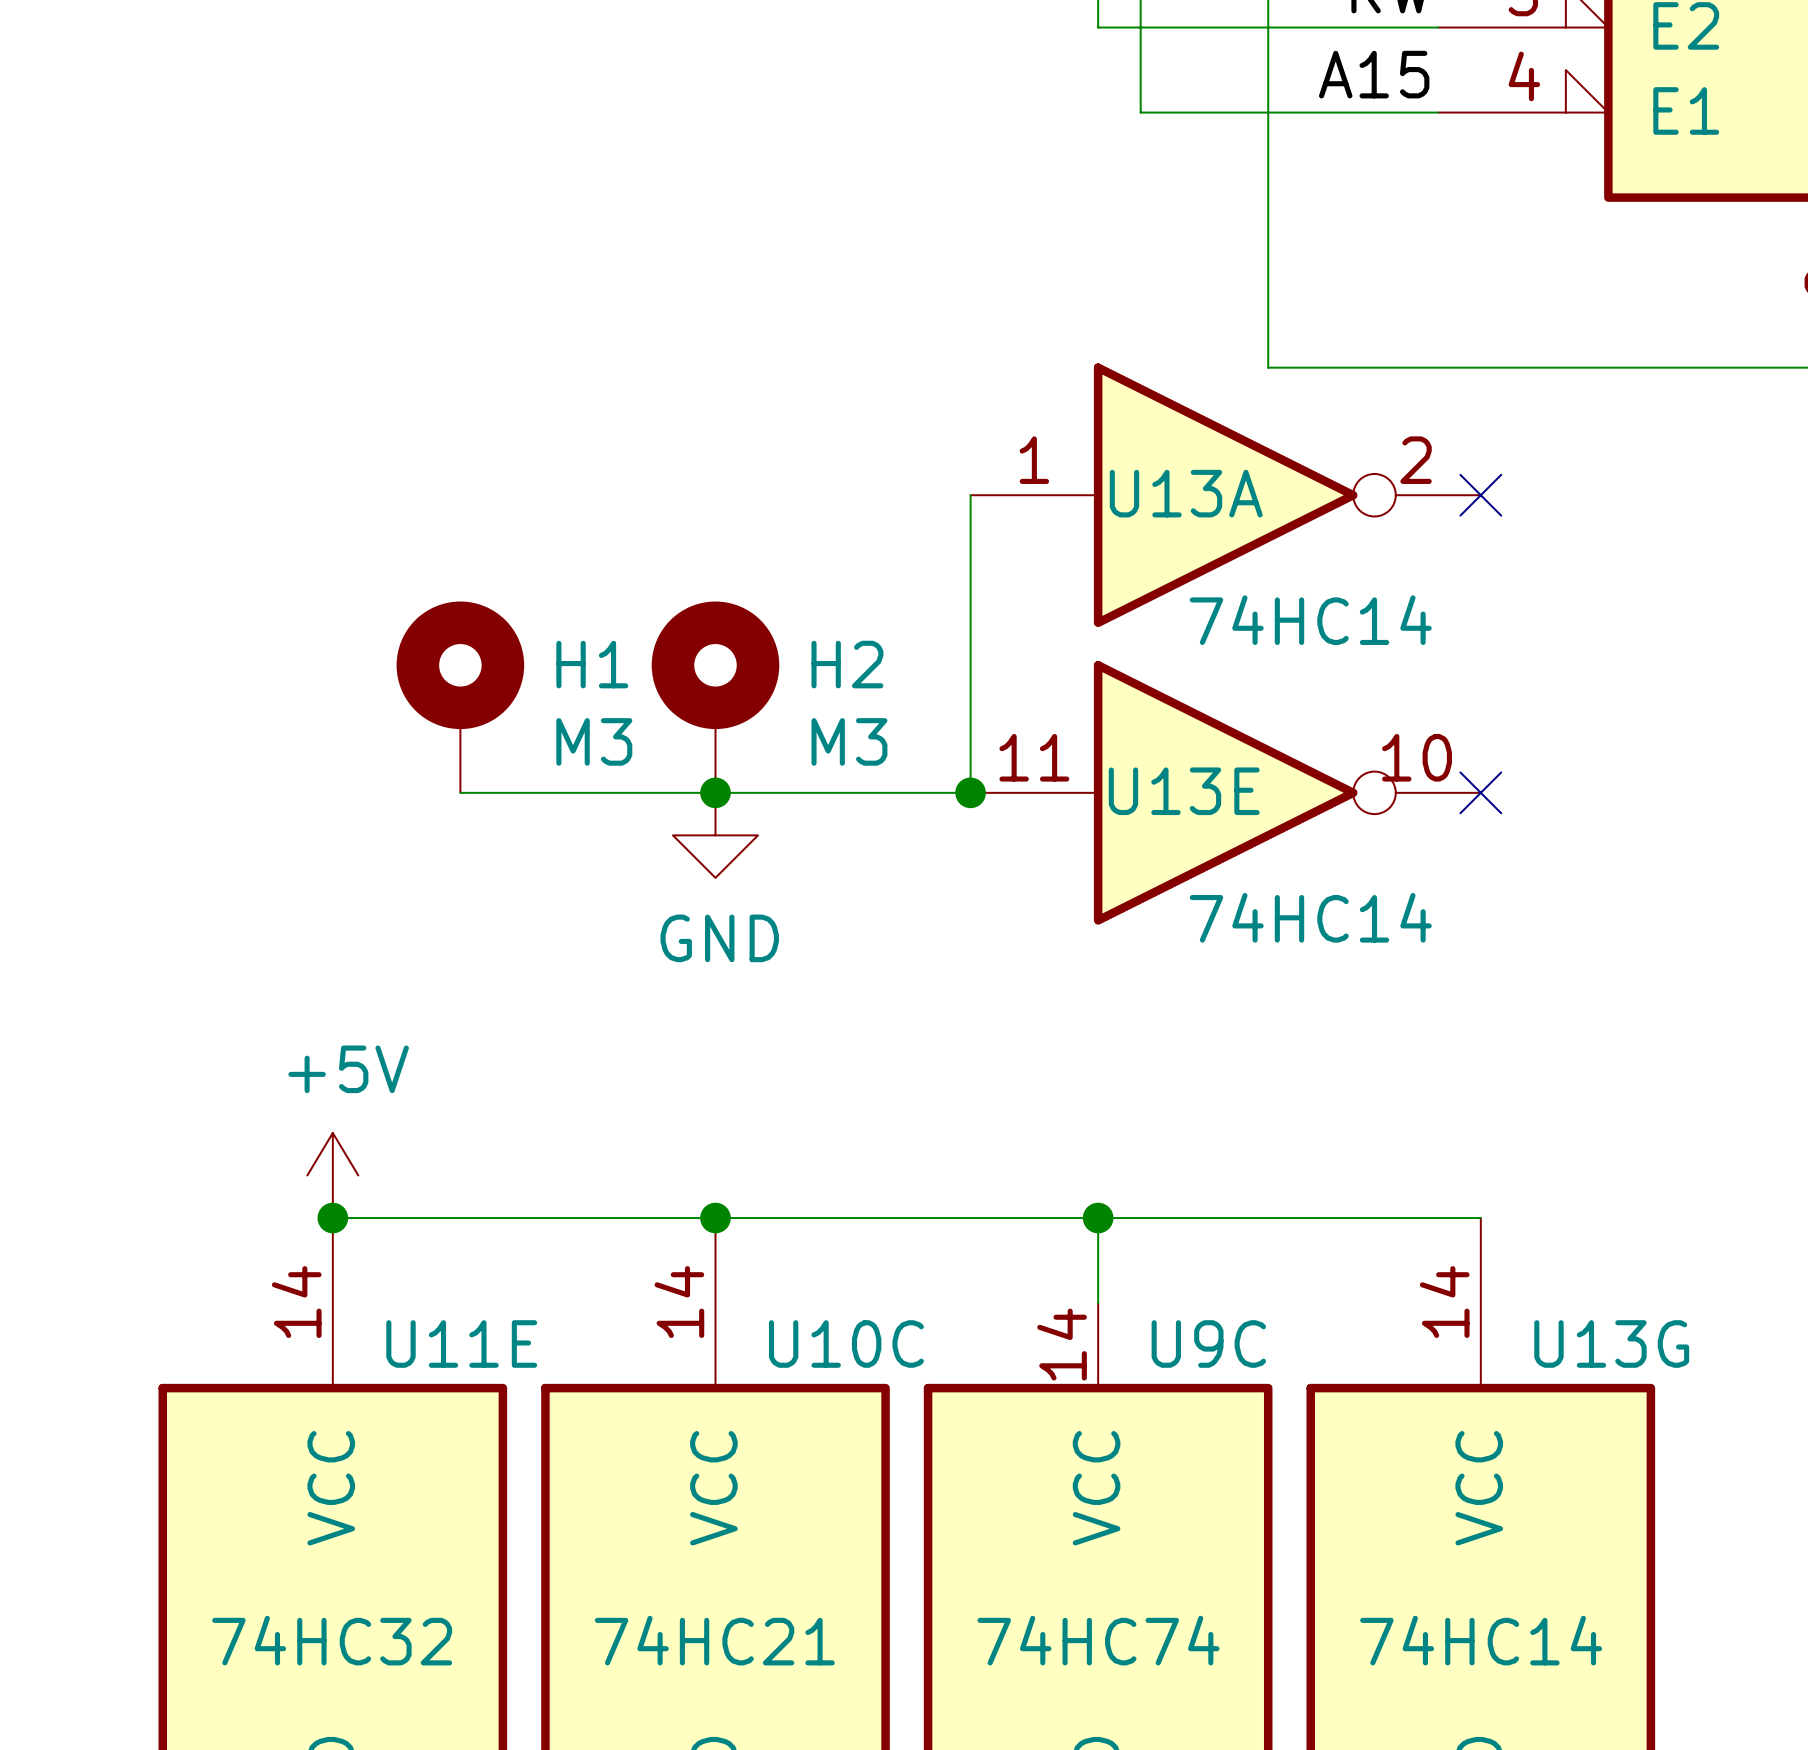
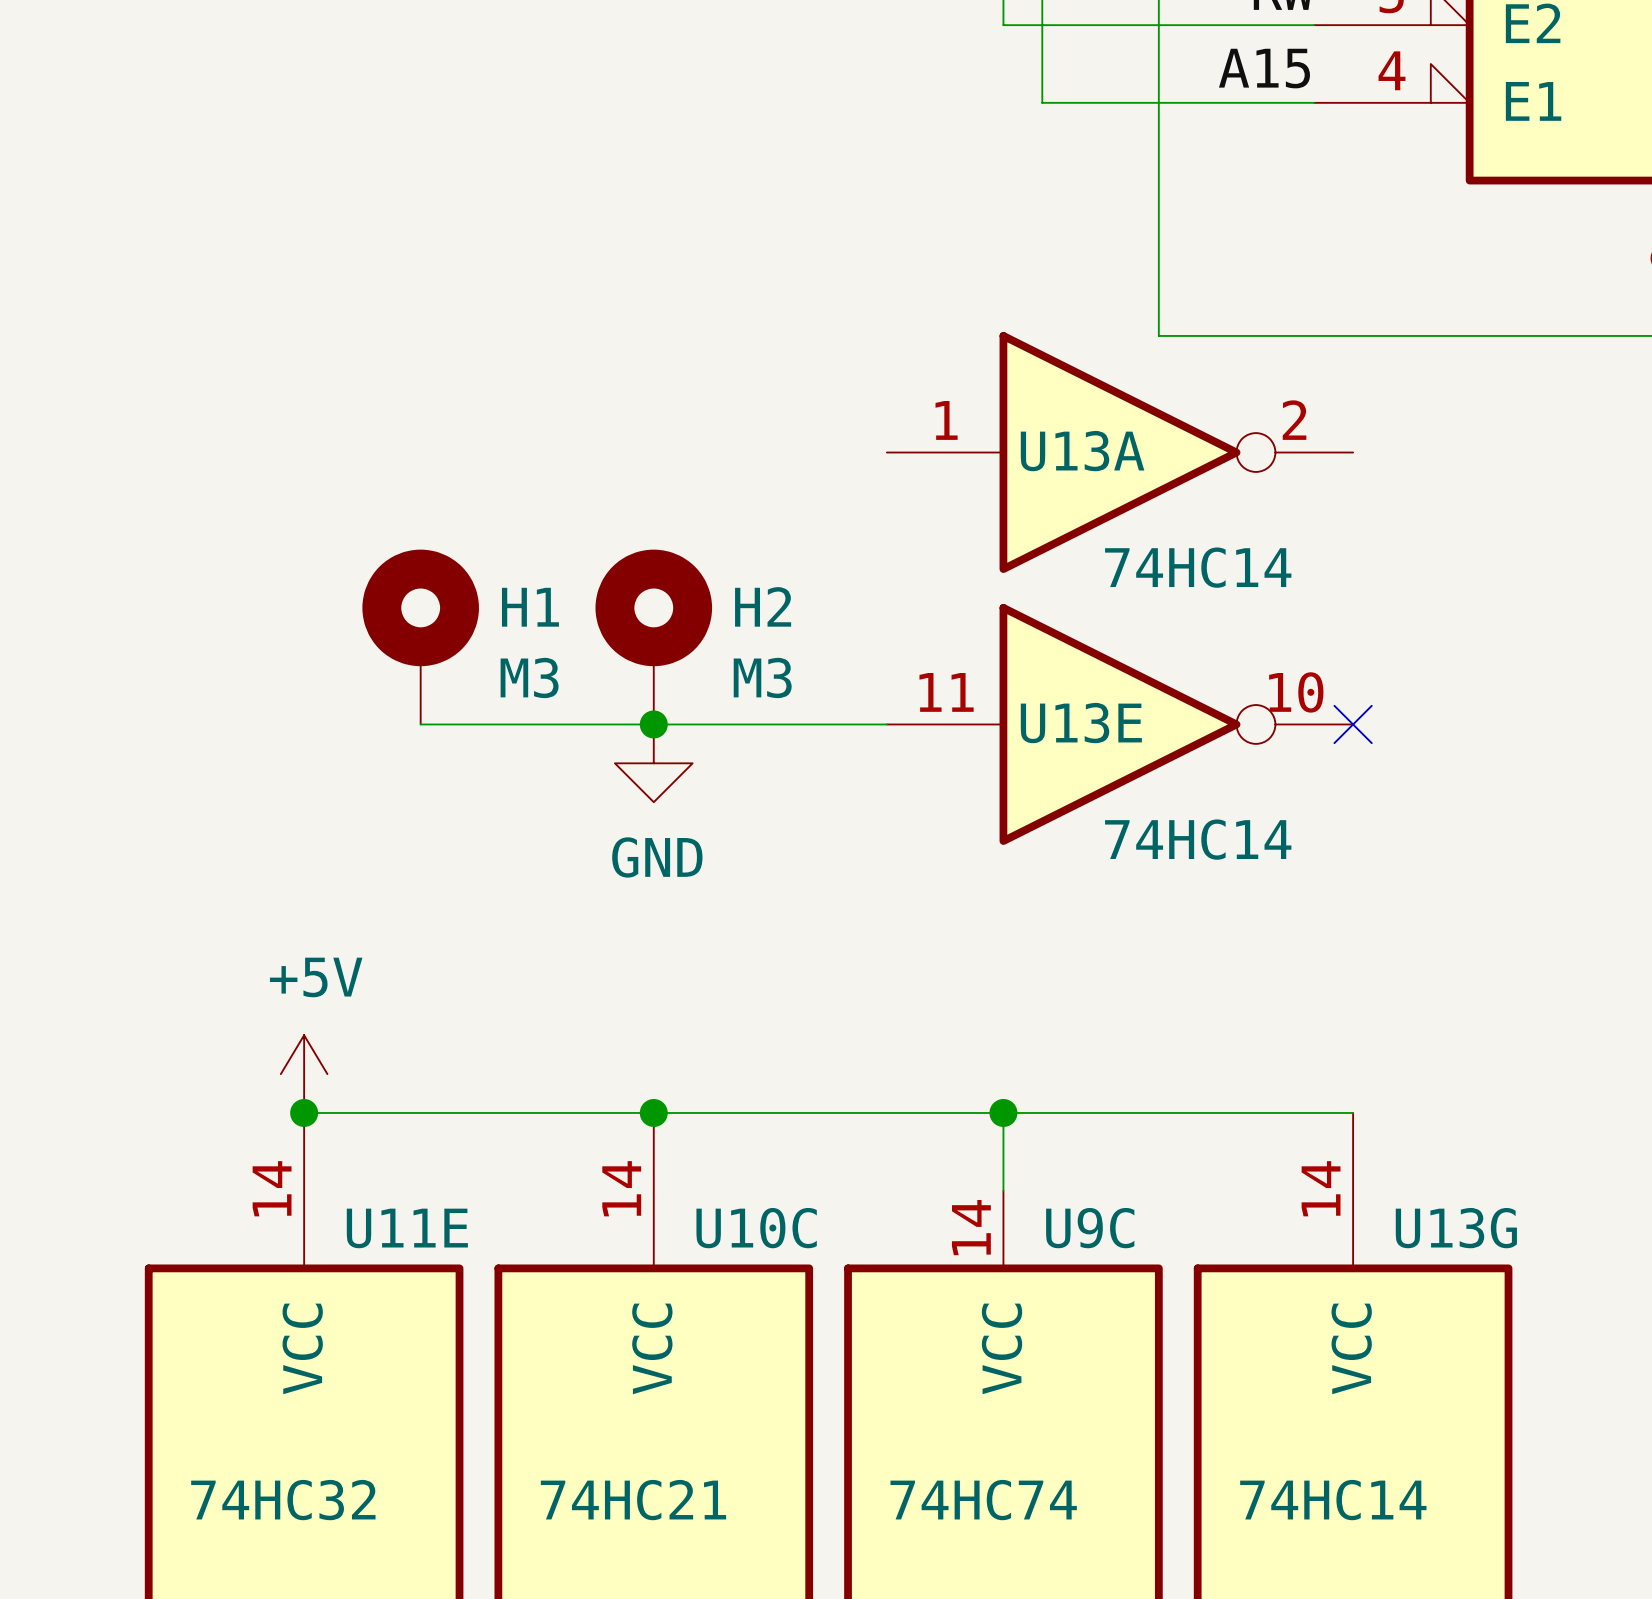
wire: (970, 495) (970, 792) -> none
no-connect mark: (1480, 495) -> none
junction: (970, 792) -> none

